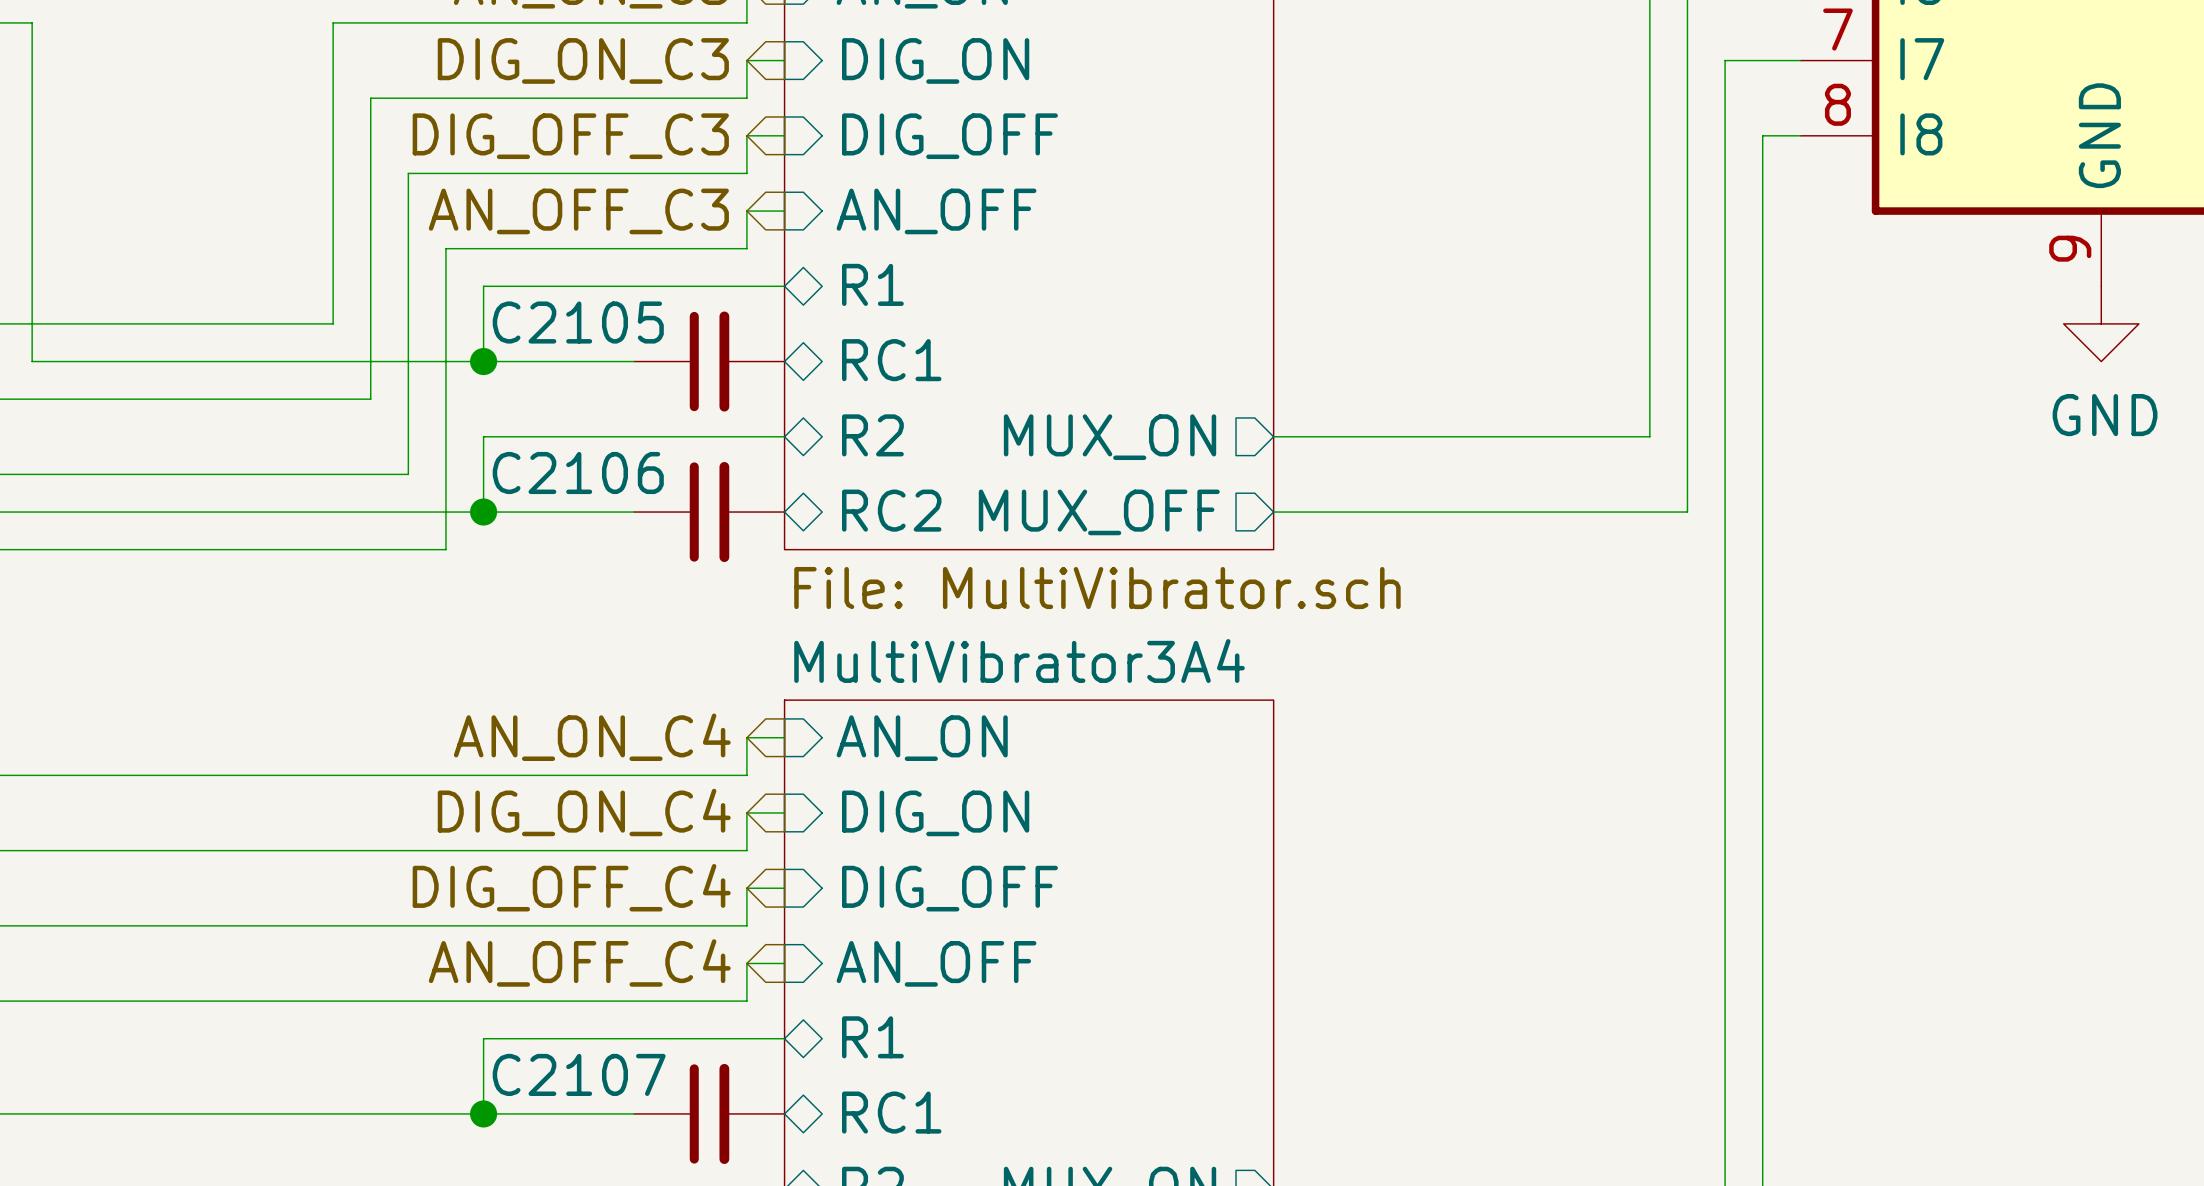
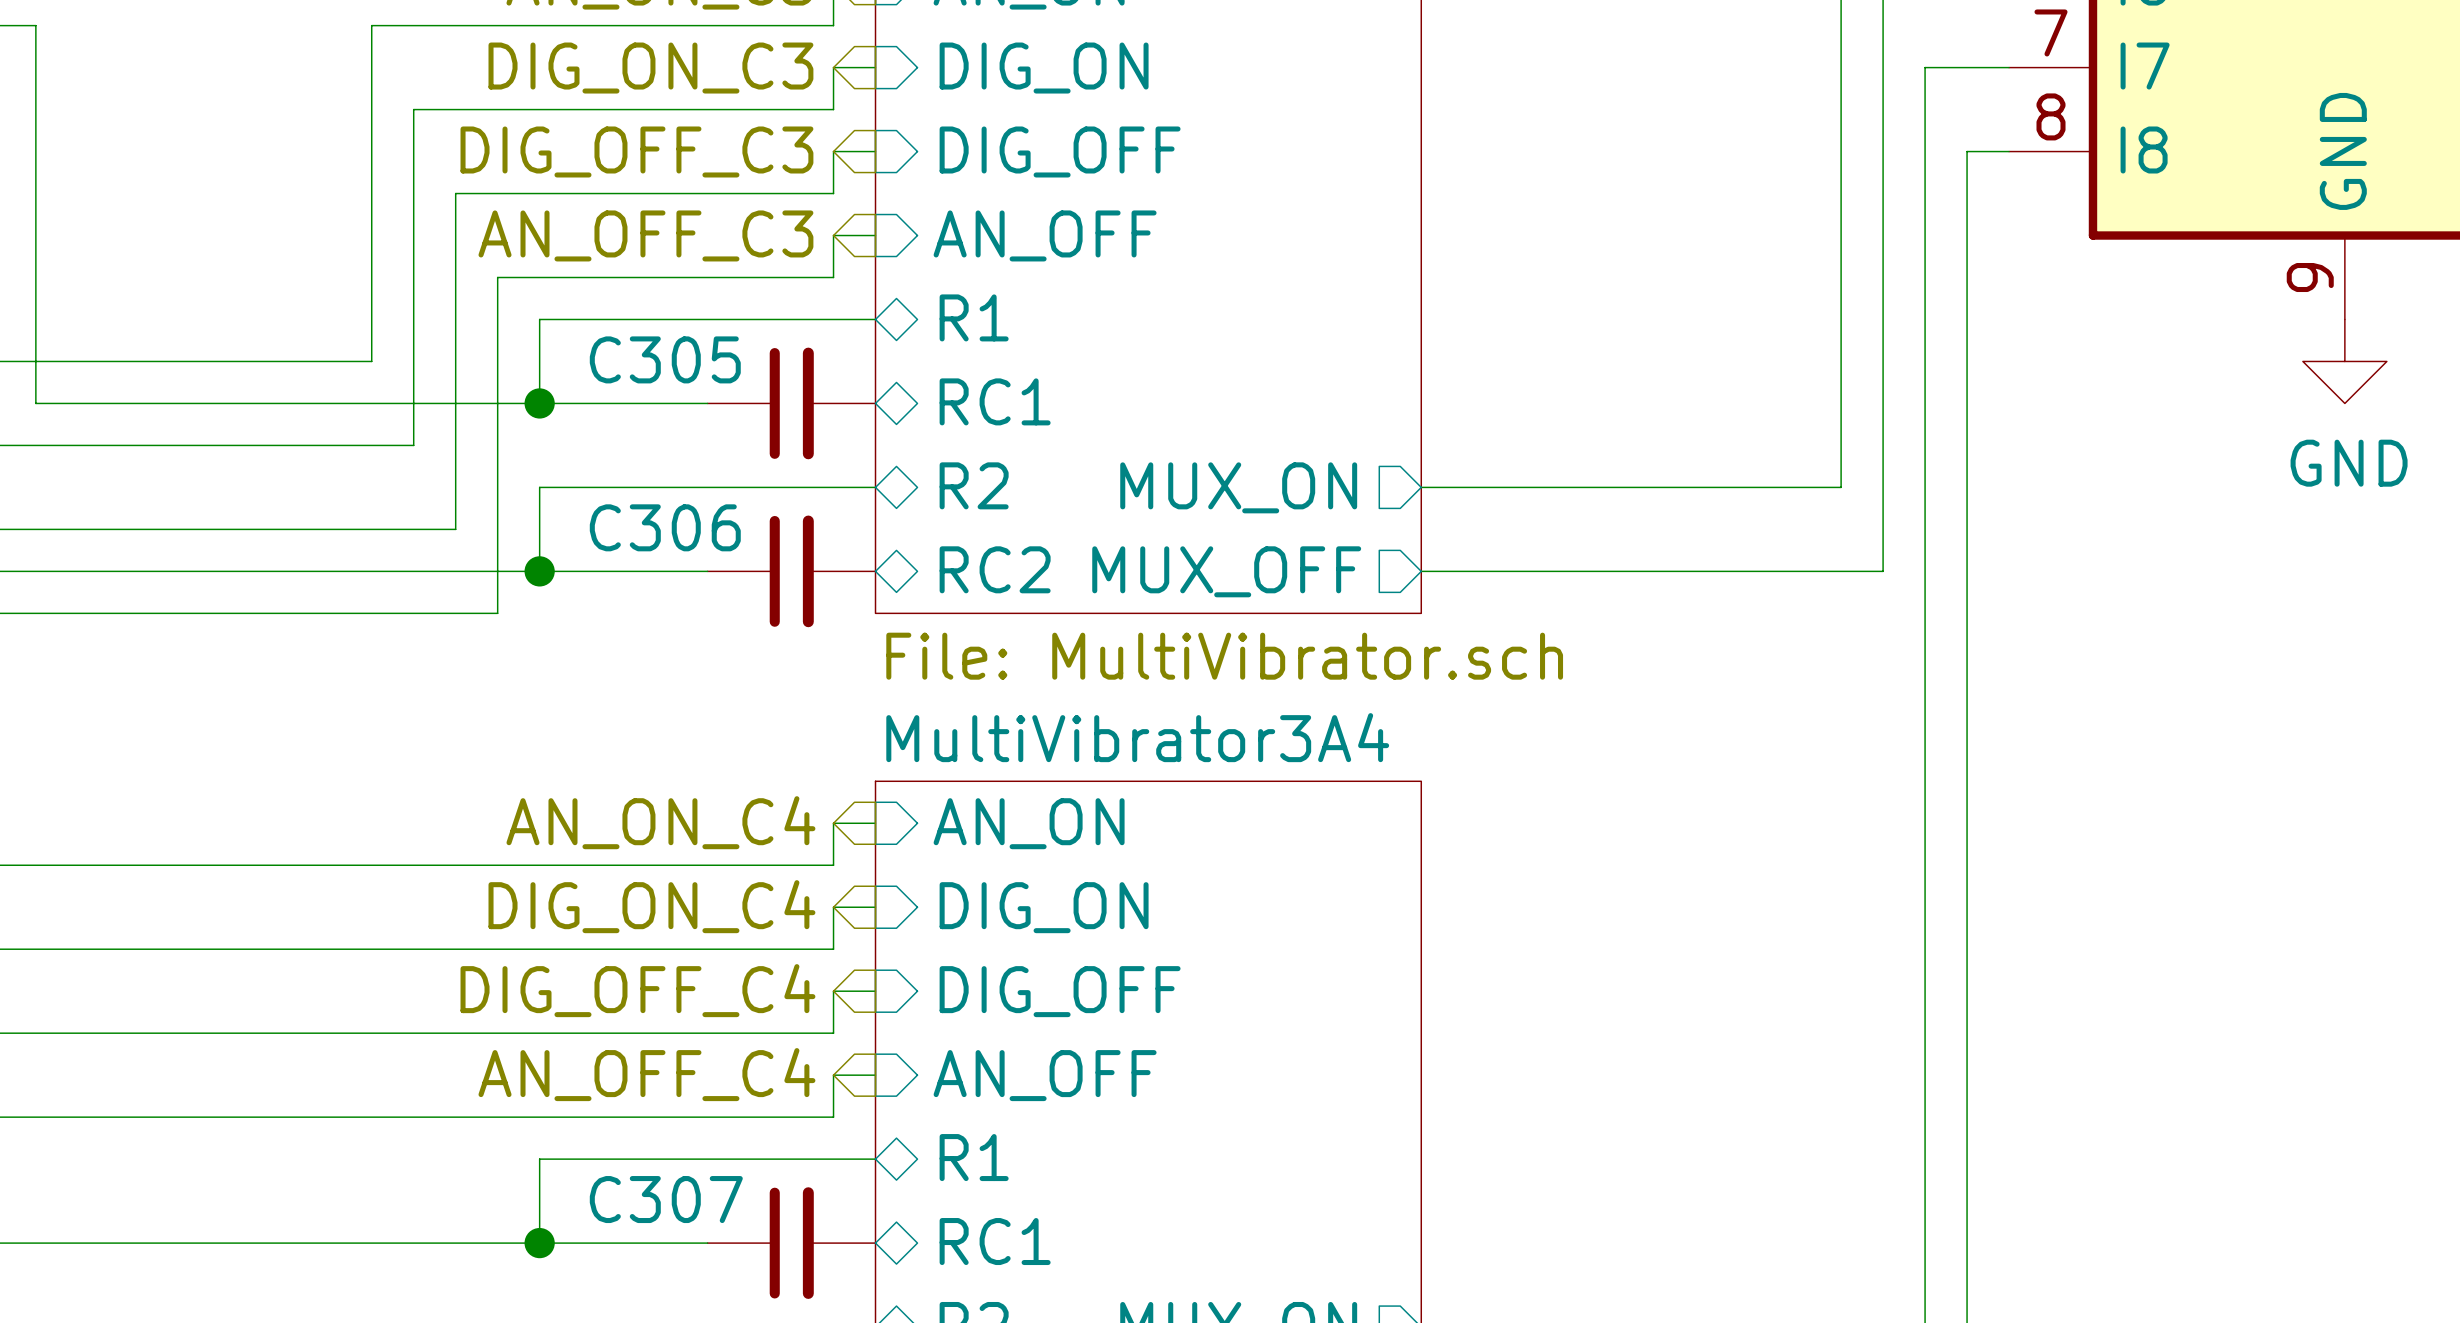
C2105 name: C2105 (578, 322) -> C305 (665, 359)
C2106 name: C2106 (578, 472) -> C306 (665, 527)
C2107 name: C2107 (579, 1074) -> C307 (666, 1199)

